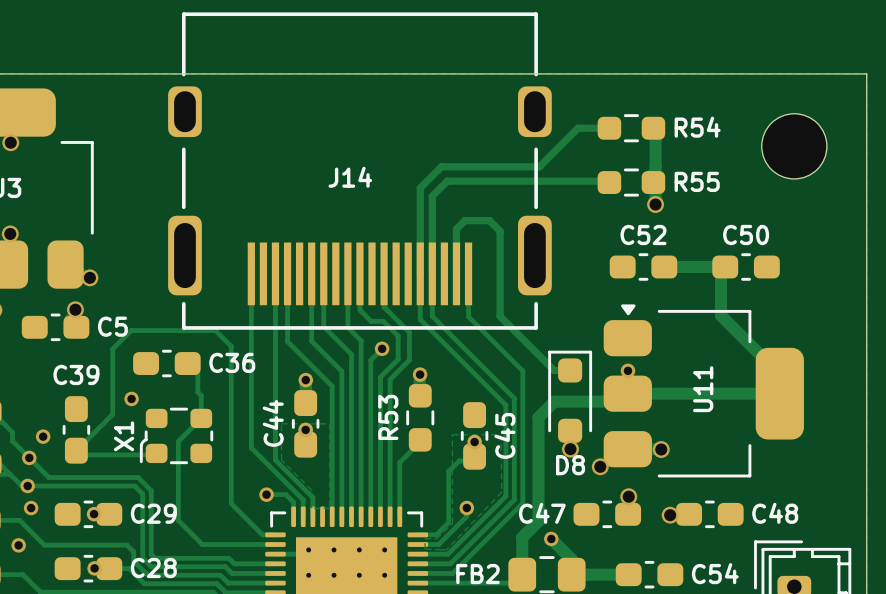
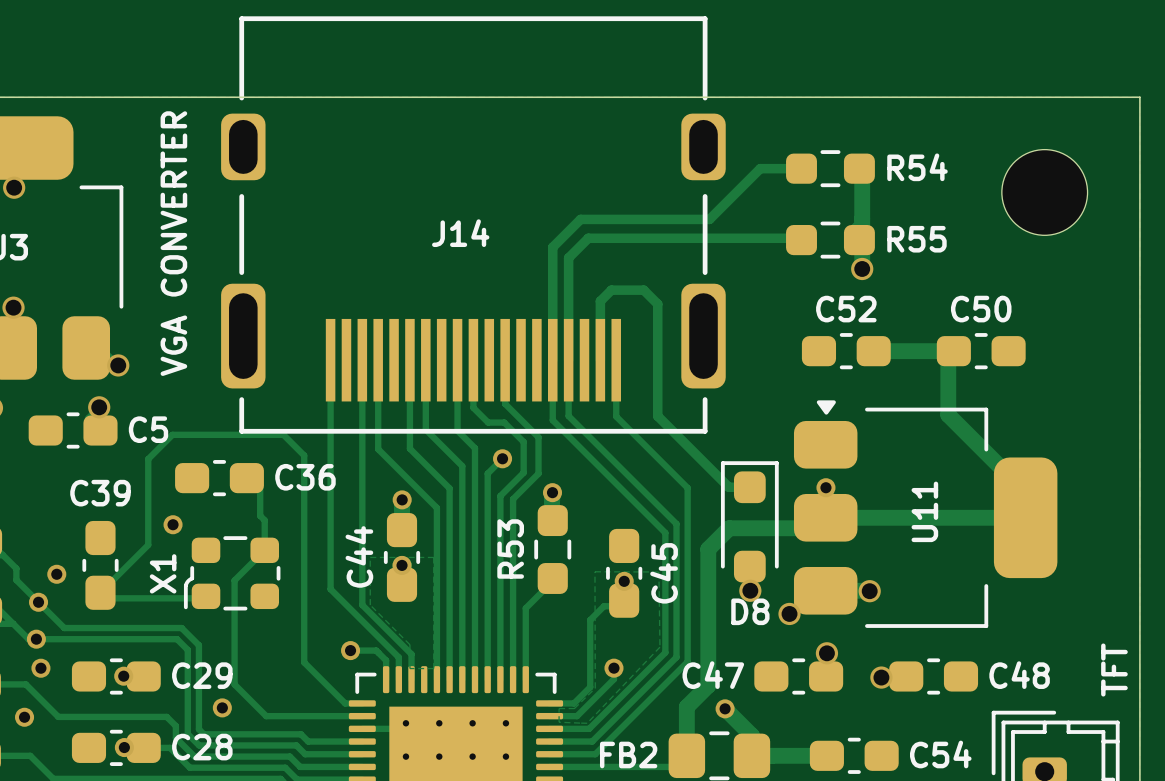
text: none -> VGA CONVERTER (173, 243)
text: none -> TFT (1114, 670)
via: none -> (222, 707)

